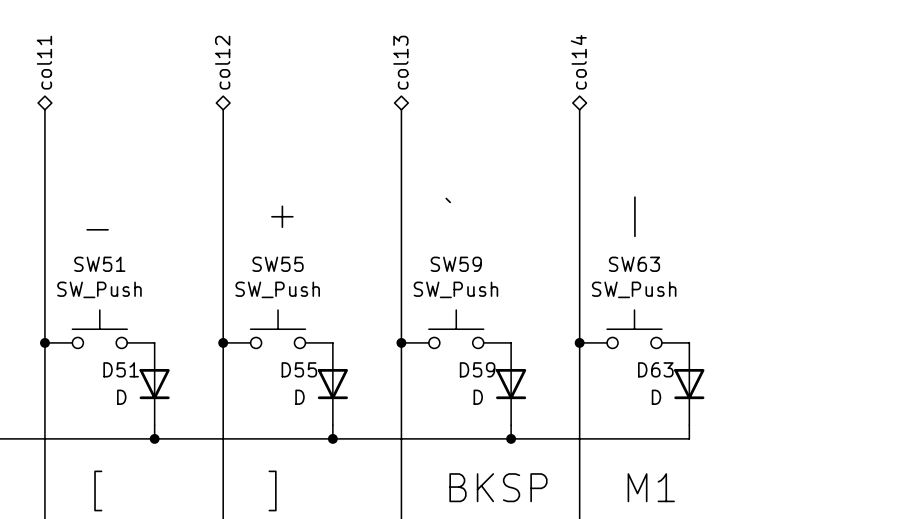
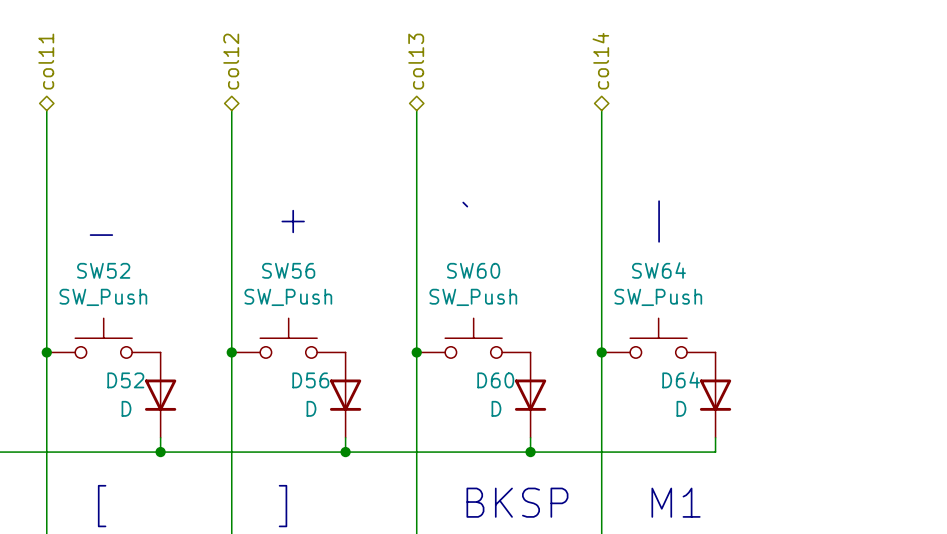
SW51 name: SW51 (99, 264) -> SW52 (103, 270)
SW55 name: SW55 (278, 264) -> SW56 (288, 270)
SW59 name: SW59 (456, 264) -> SW60 (473, 270)
SW63 name: SW63 (634, 264) -> SW64 (658, 270)
D51 name: D51 (121, 369) -> D52 (125, 380)
D55 name: D55 (299, 369) -> D56 (310, 380)
D59 name: D59 (477, 369) -> D60 (495, 380)
D63 name: D63 (655, 369) -> D64 (681, 380)

